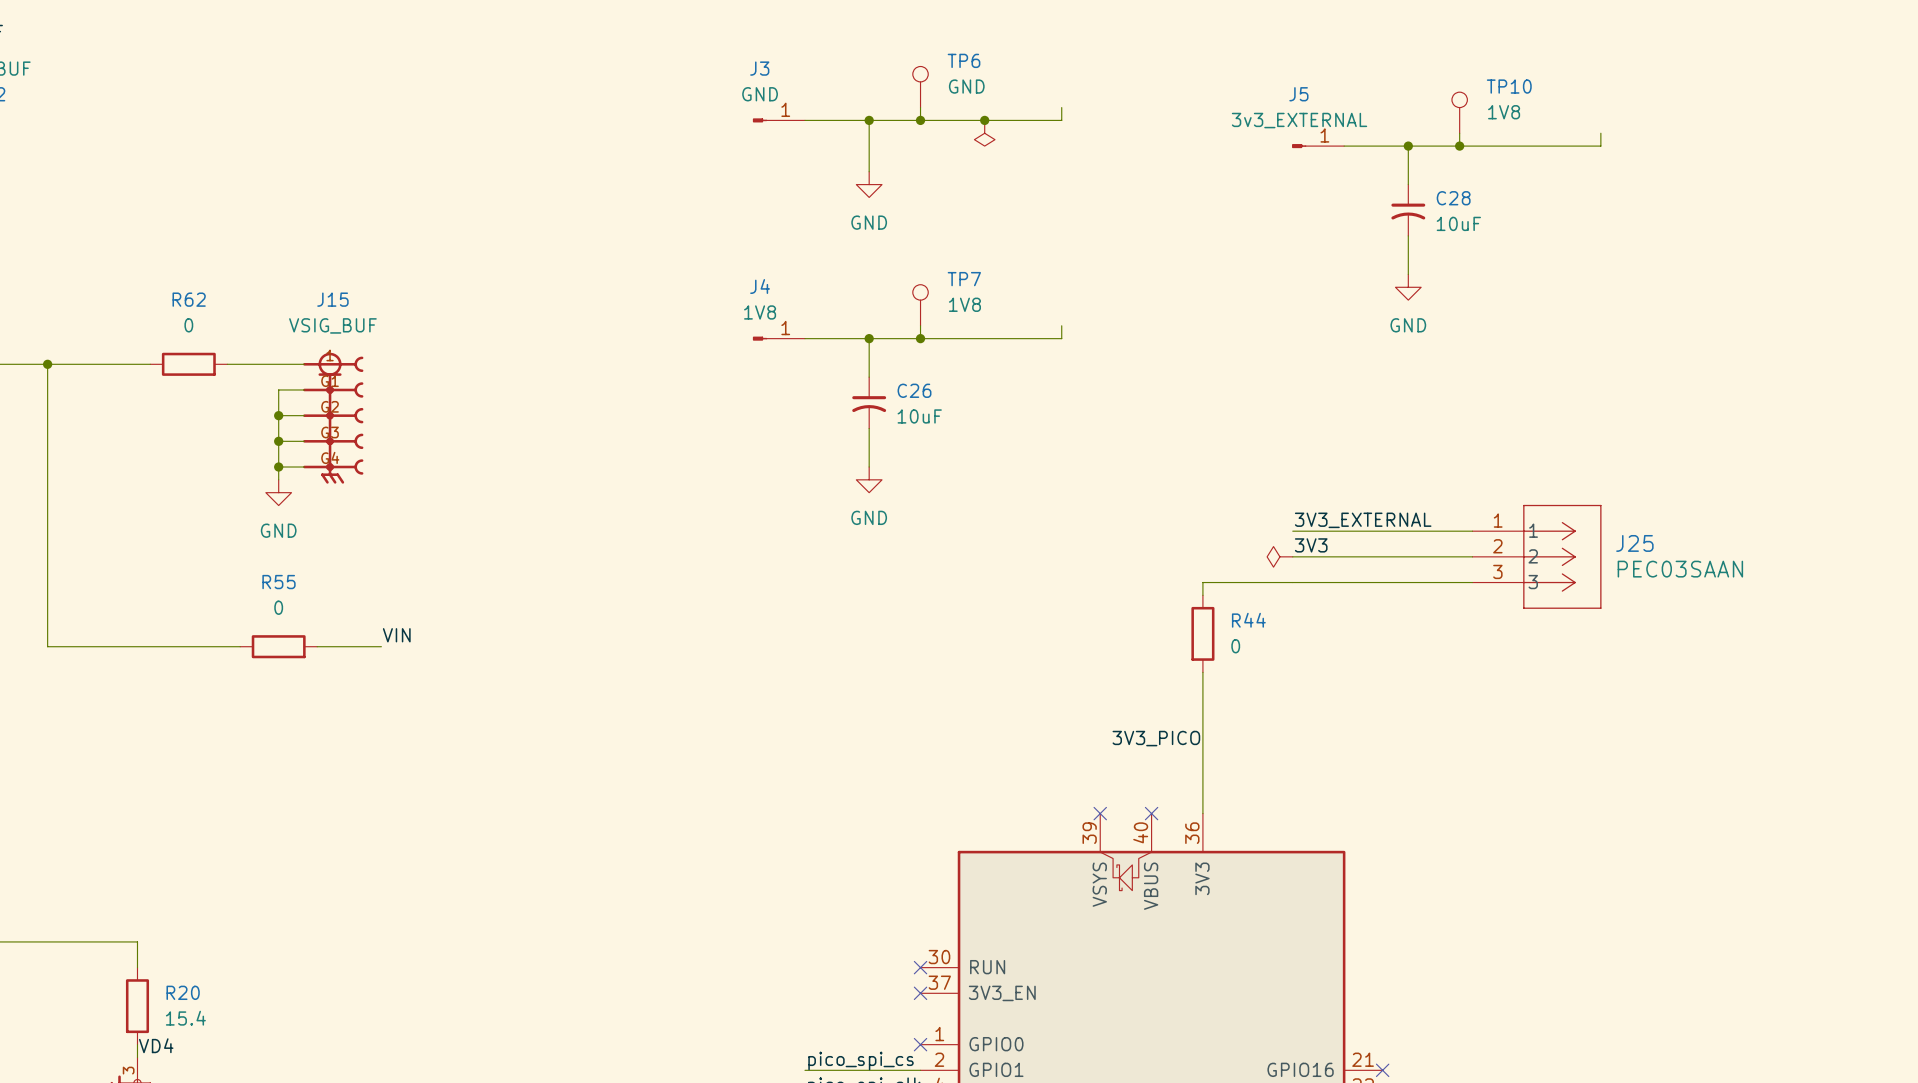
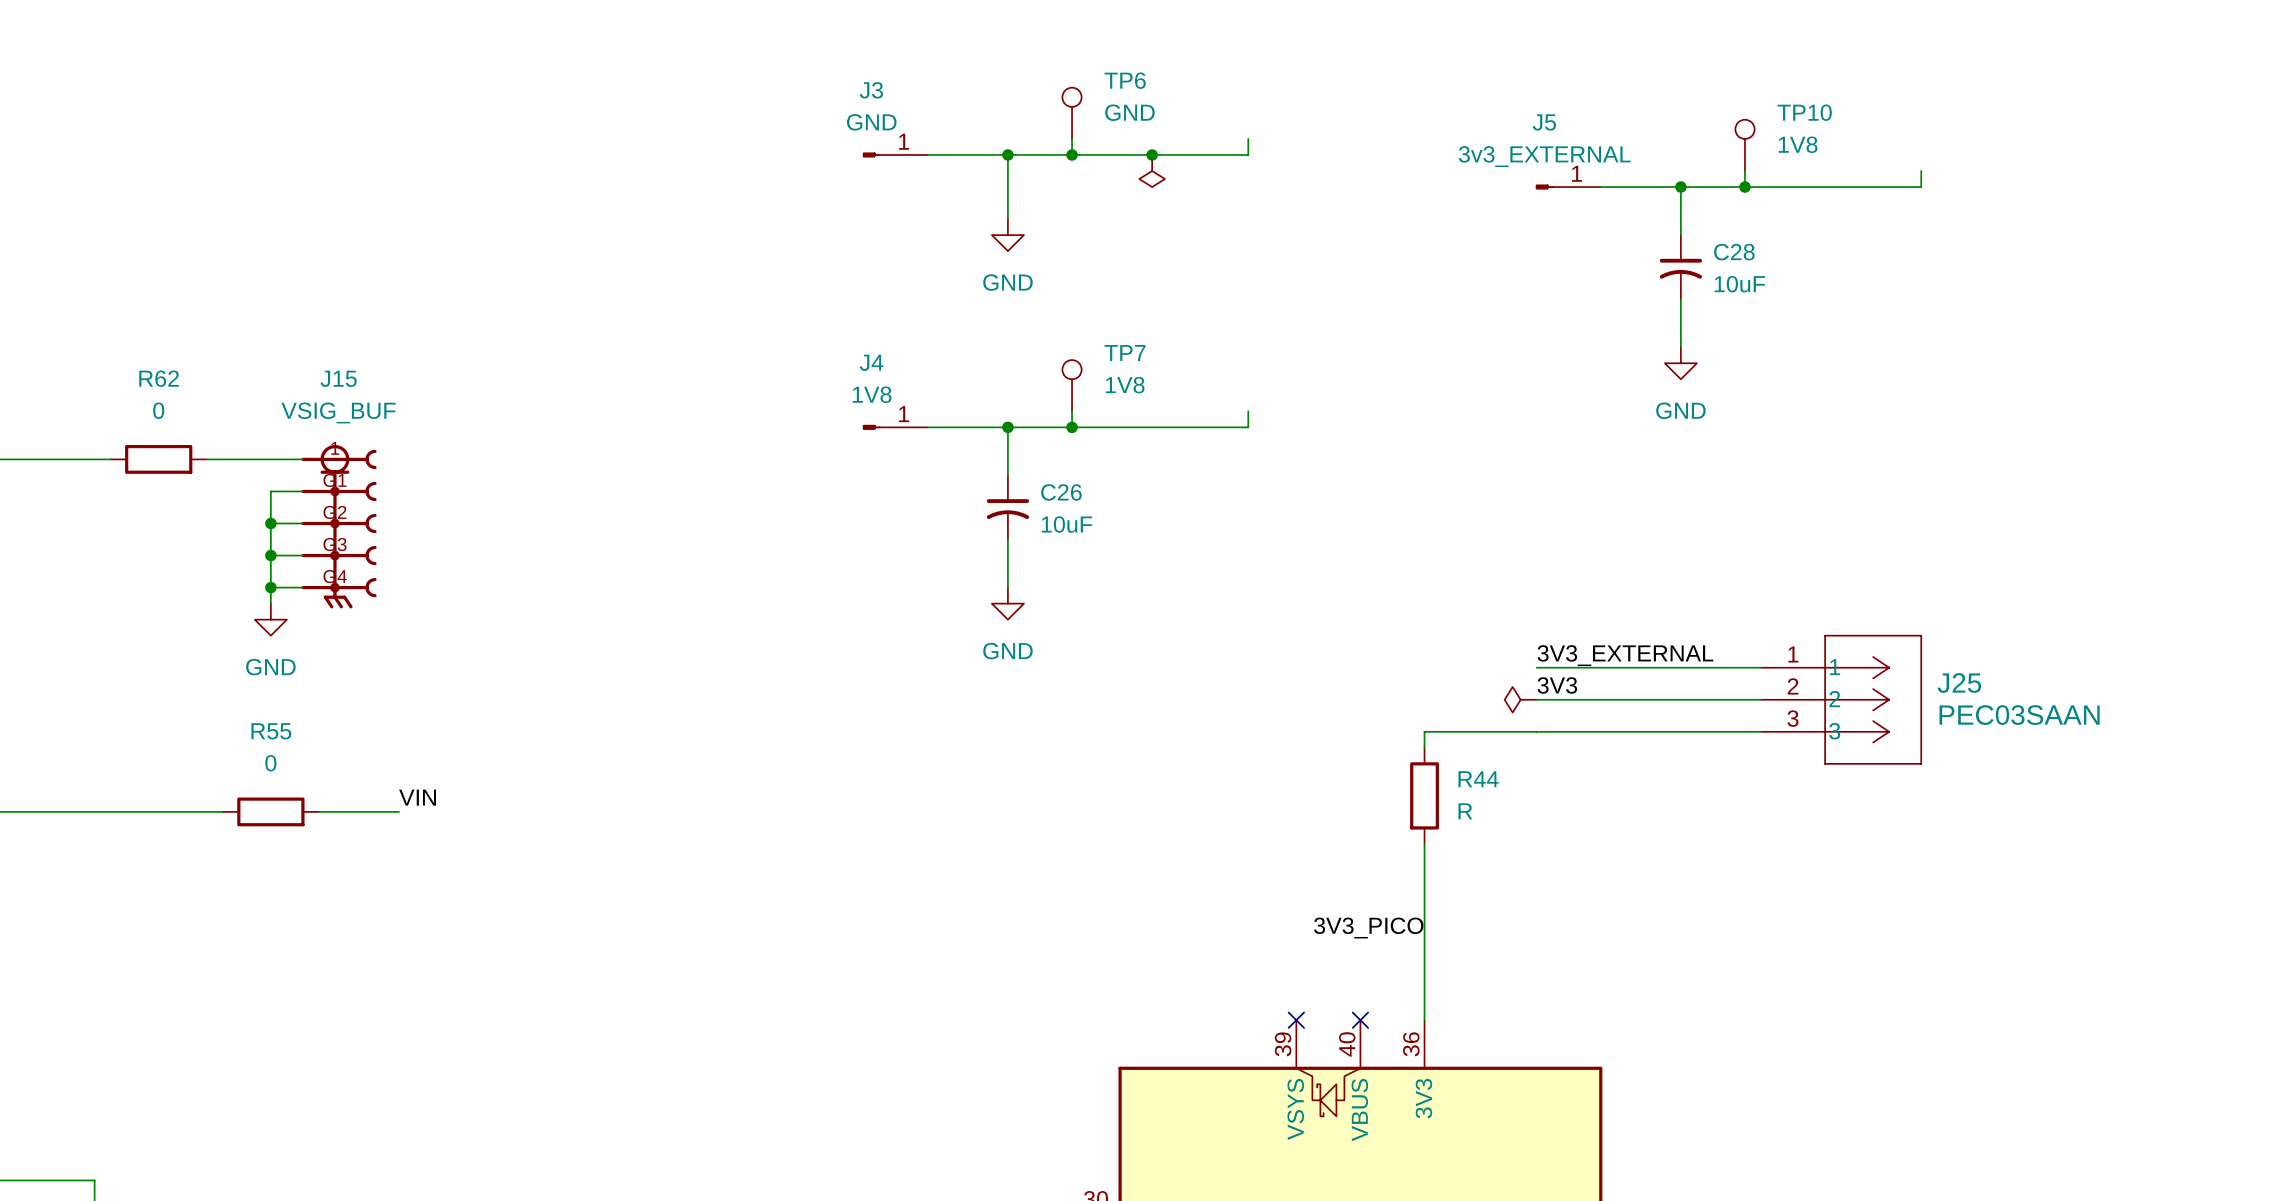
R44 value: 0 (1235, 646) -> R (1465, 811)

